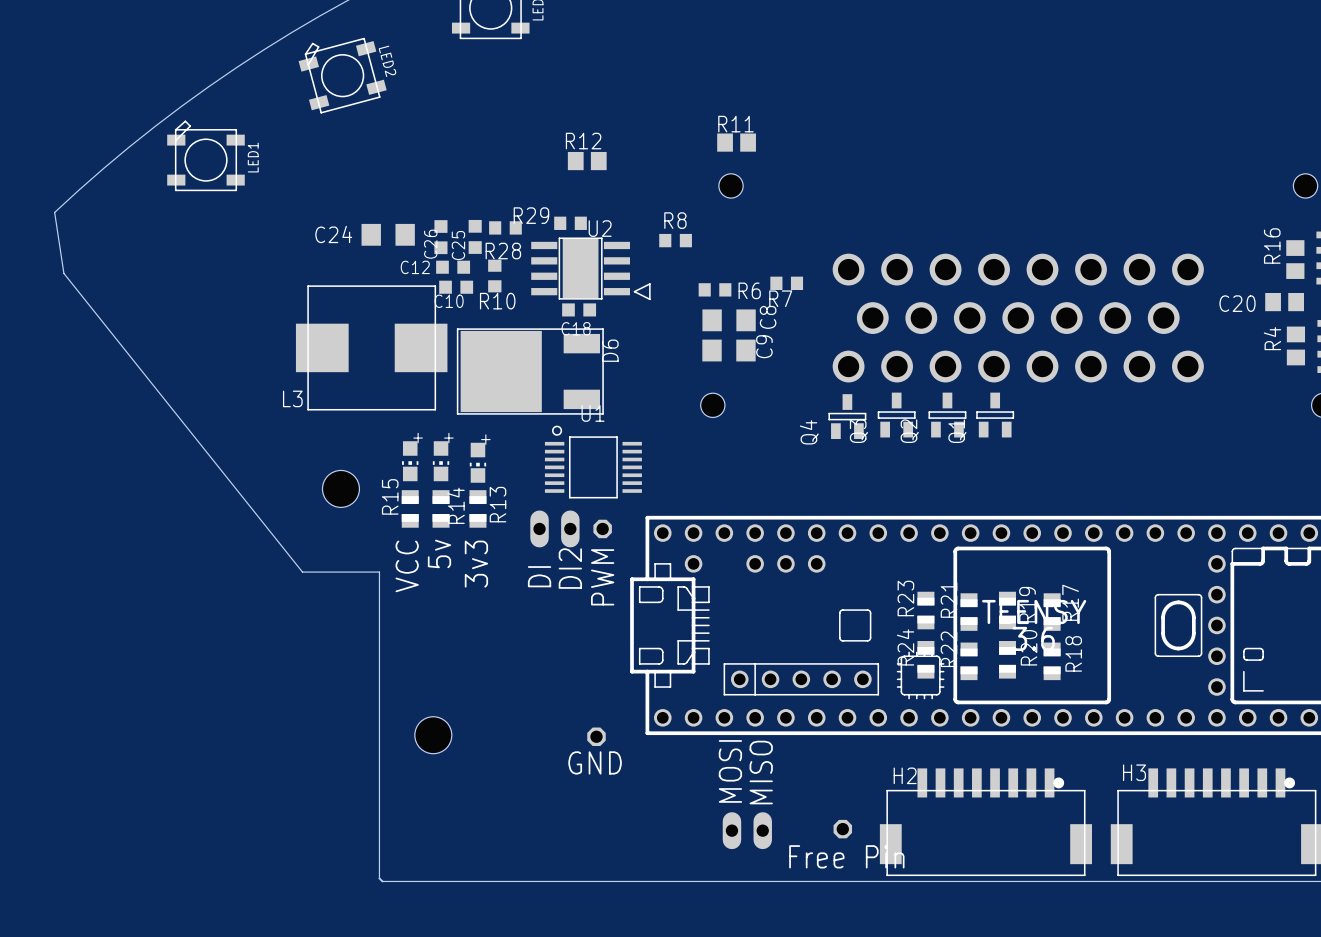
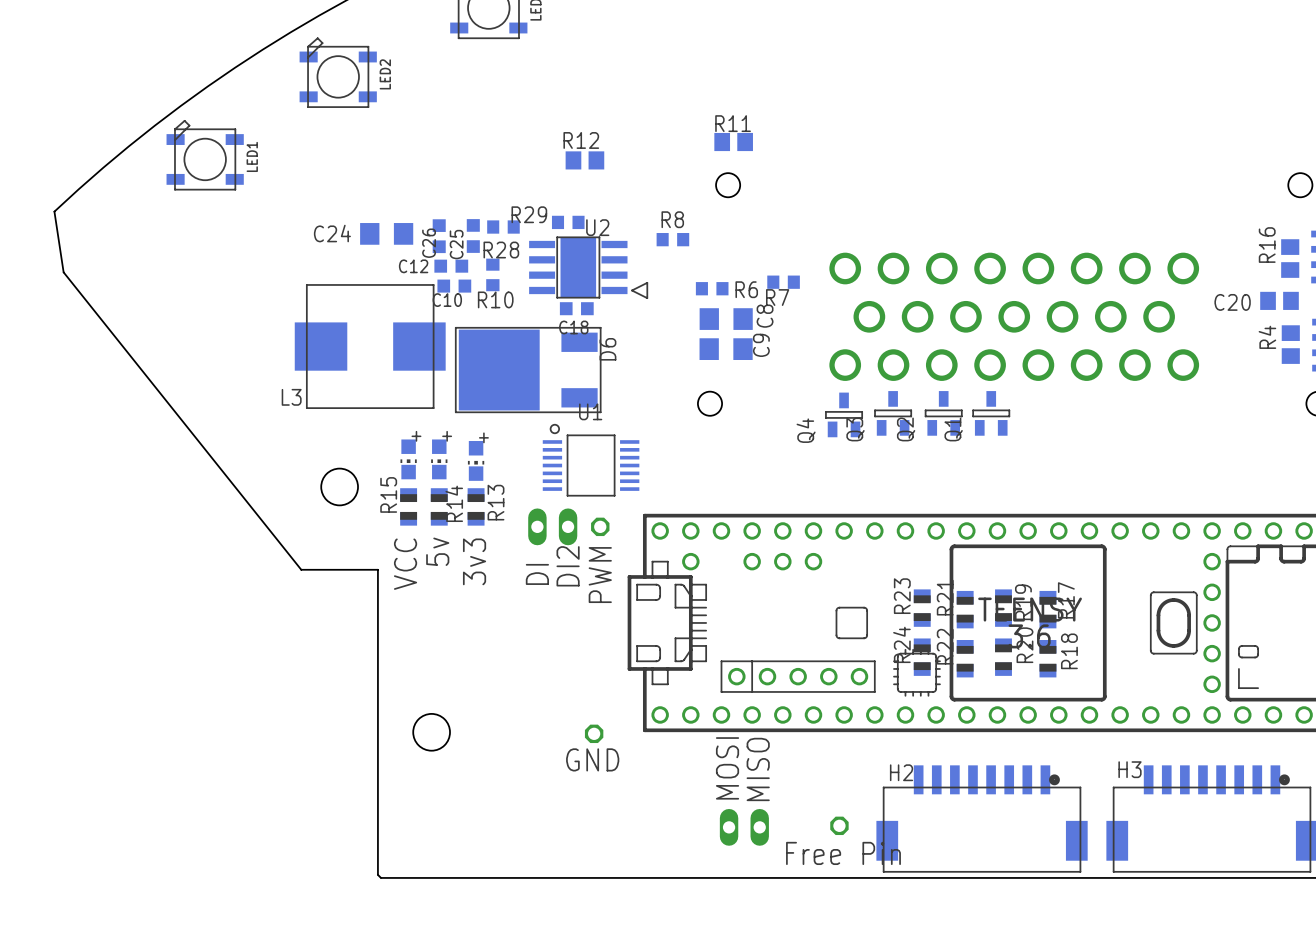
LED2 rotation: 0° (342, 75) -> 15° clockwise (338, 72)

